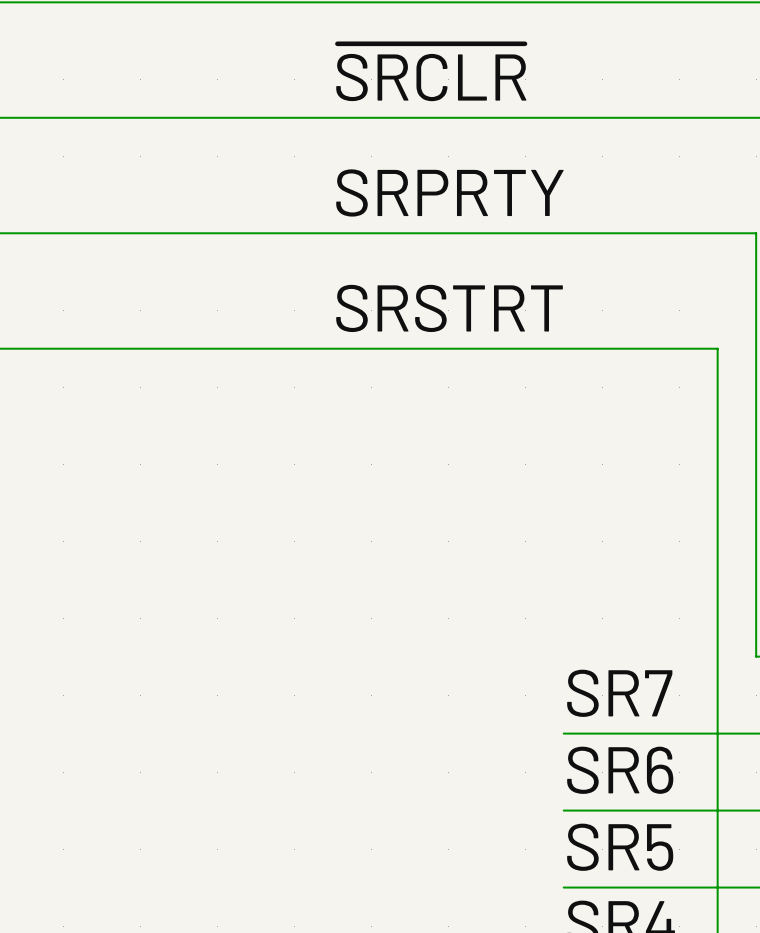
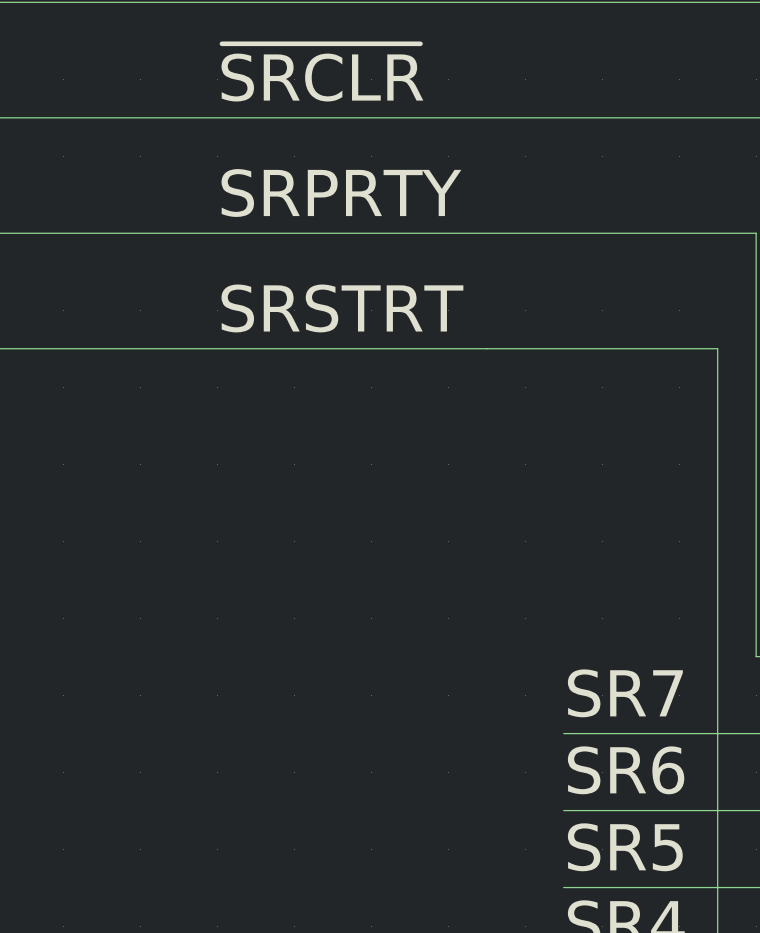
label position: ~{SRCLR} (431, 72) -> ~{SRCLR} (322, 72)
label position: SRPRTY (449, 192) -> SRPRTY (341, 193)
label position: SRSTRT (449, 308) -> SRSTRT (342, 308)

